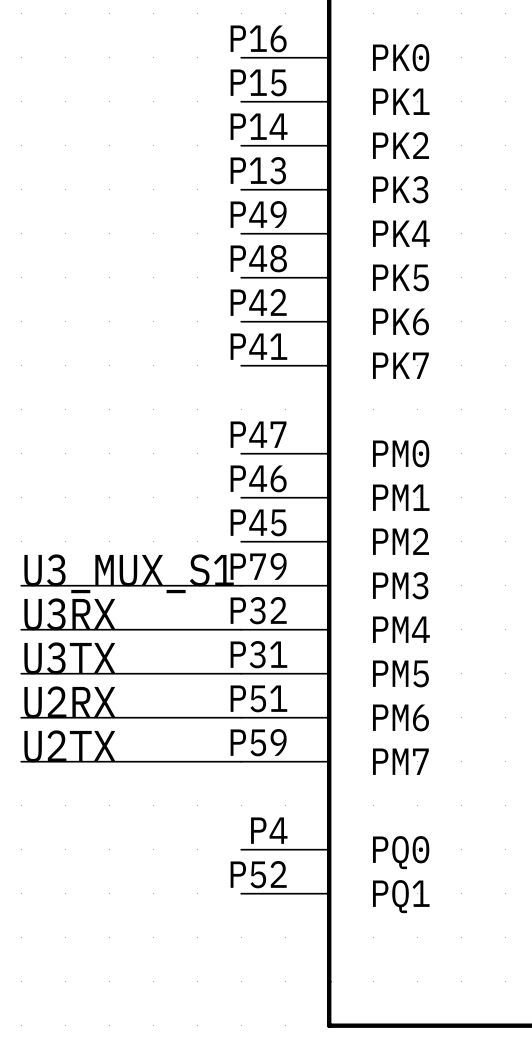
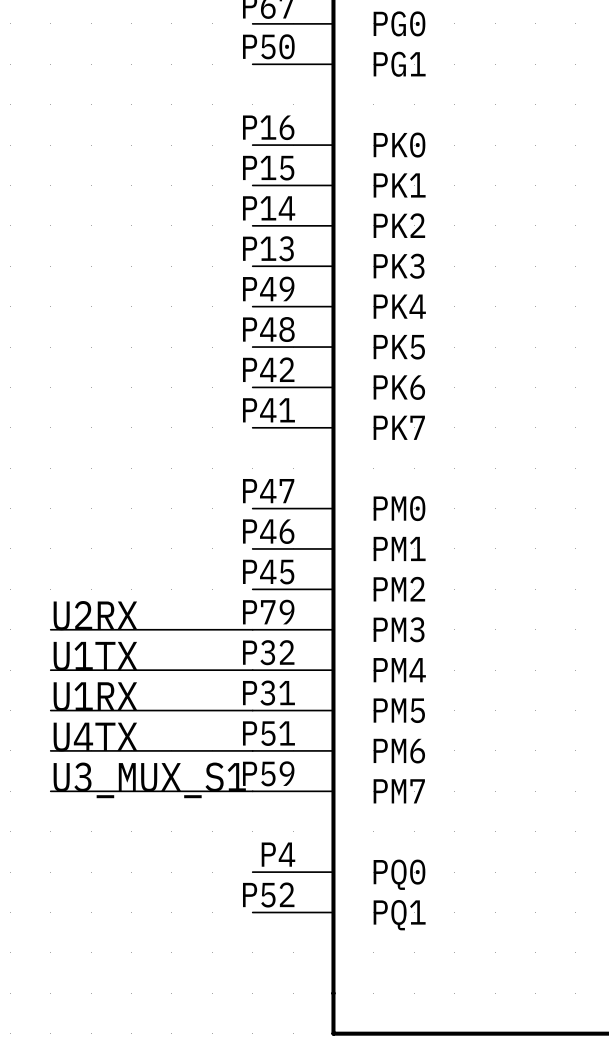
label: U3_MUX_S1 (129, 573) -> U2RX (95, 615)
label: U3RX (69, 614) -> U1TX (95, 656)
label: U3TX (69, 658) -> U1RX (95, 696)
label: U2RX (69, 702) -> U4TX (95, 737)
label: U2TX (69, 746) -> U3_MUX_S1 (149, 780)

